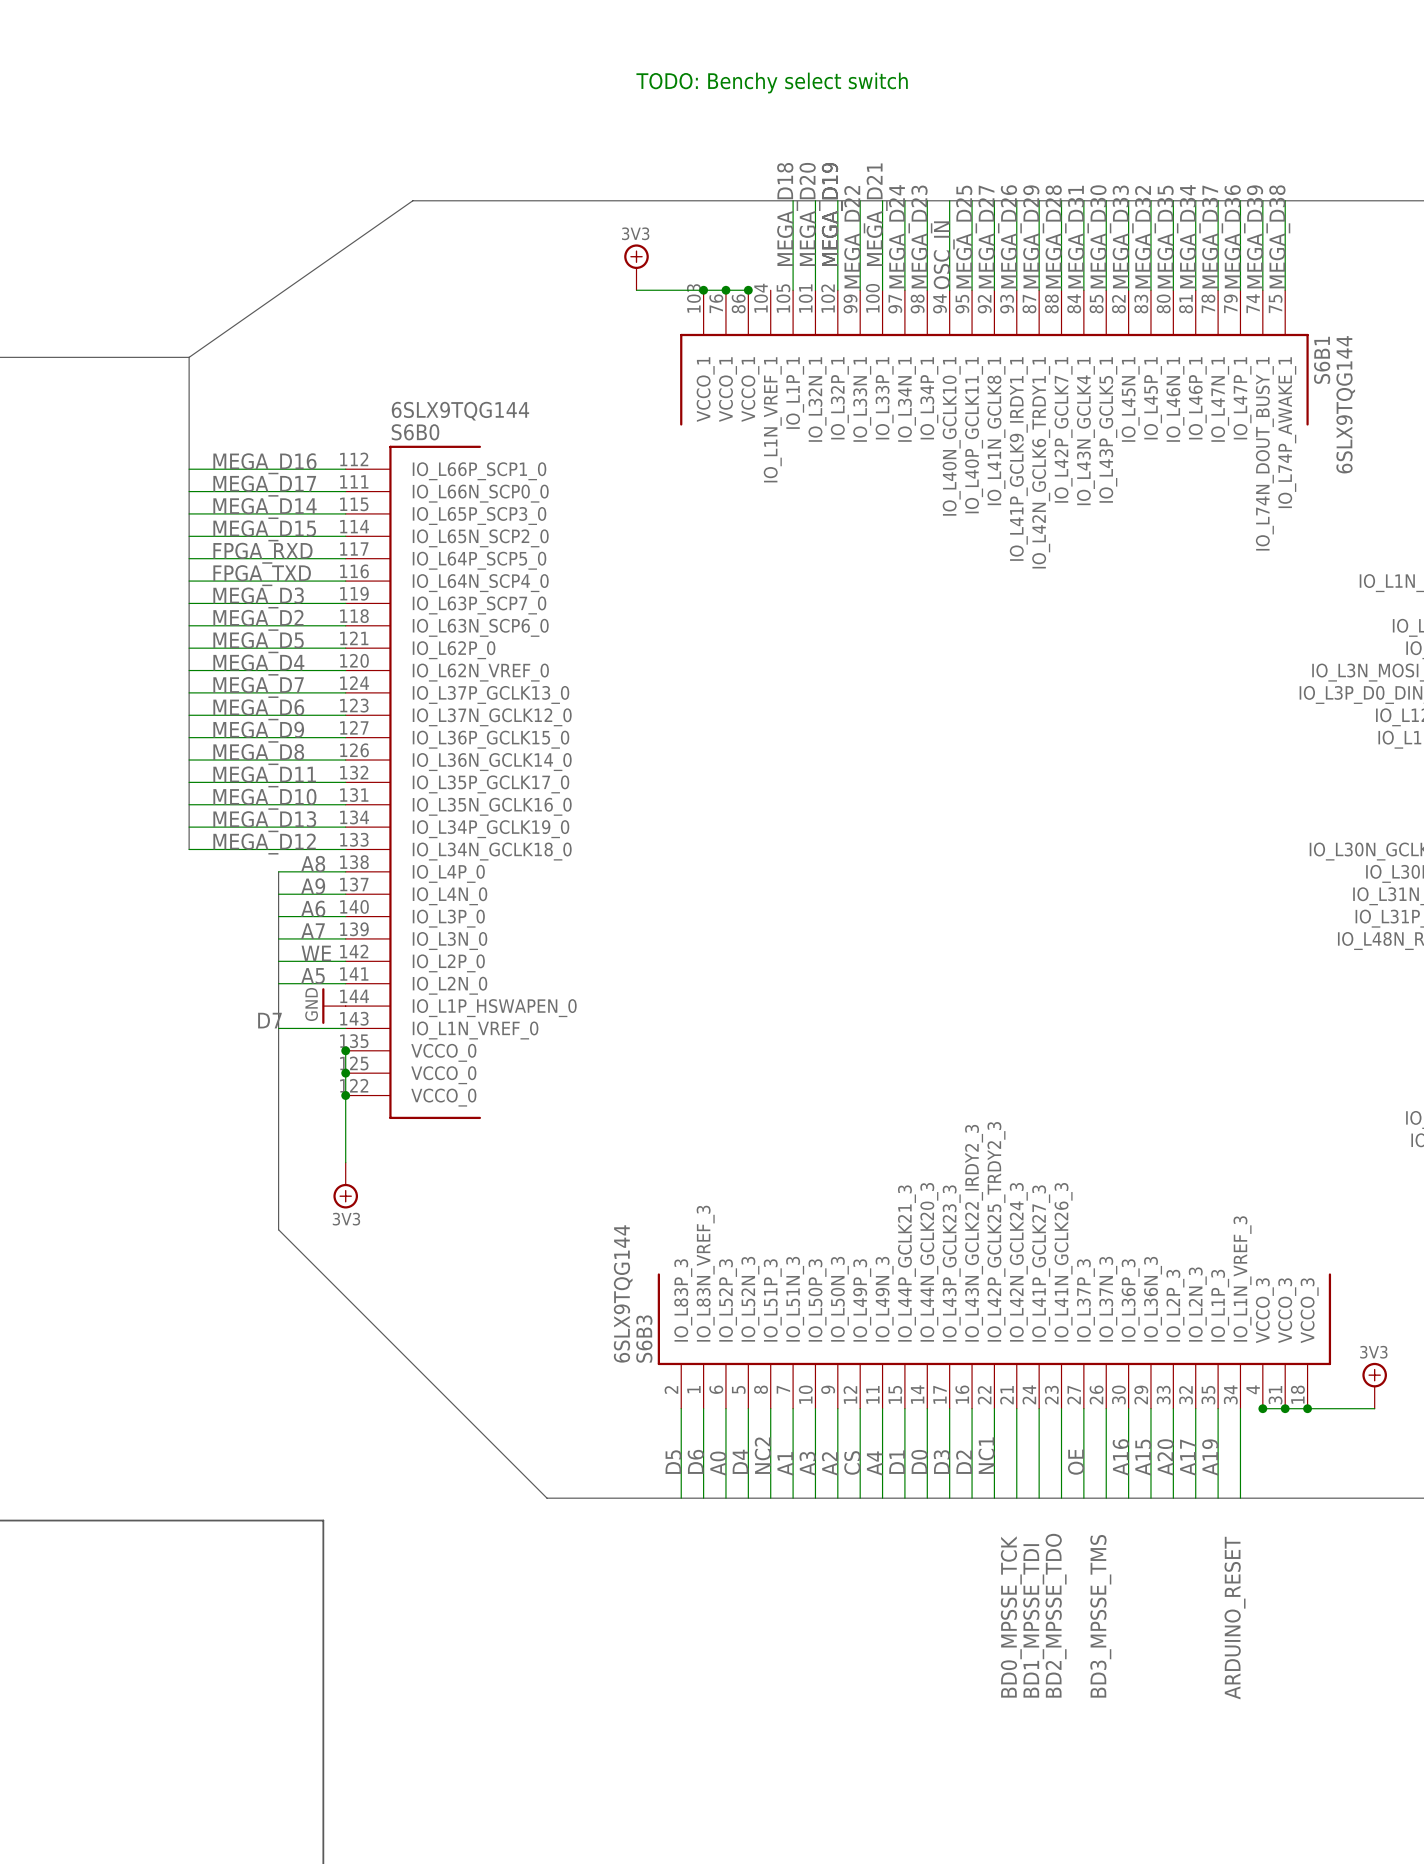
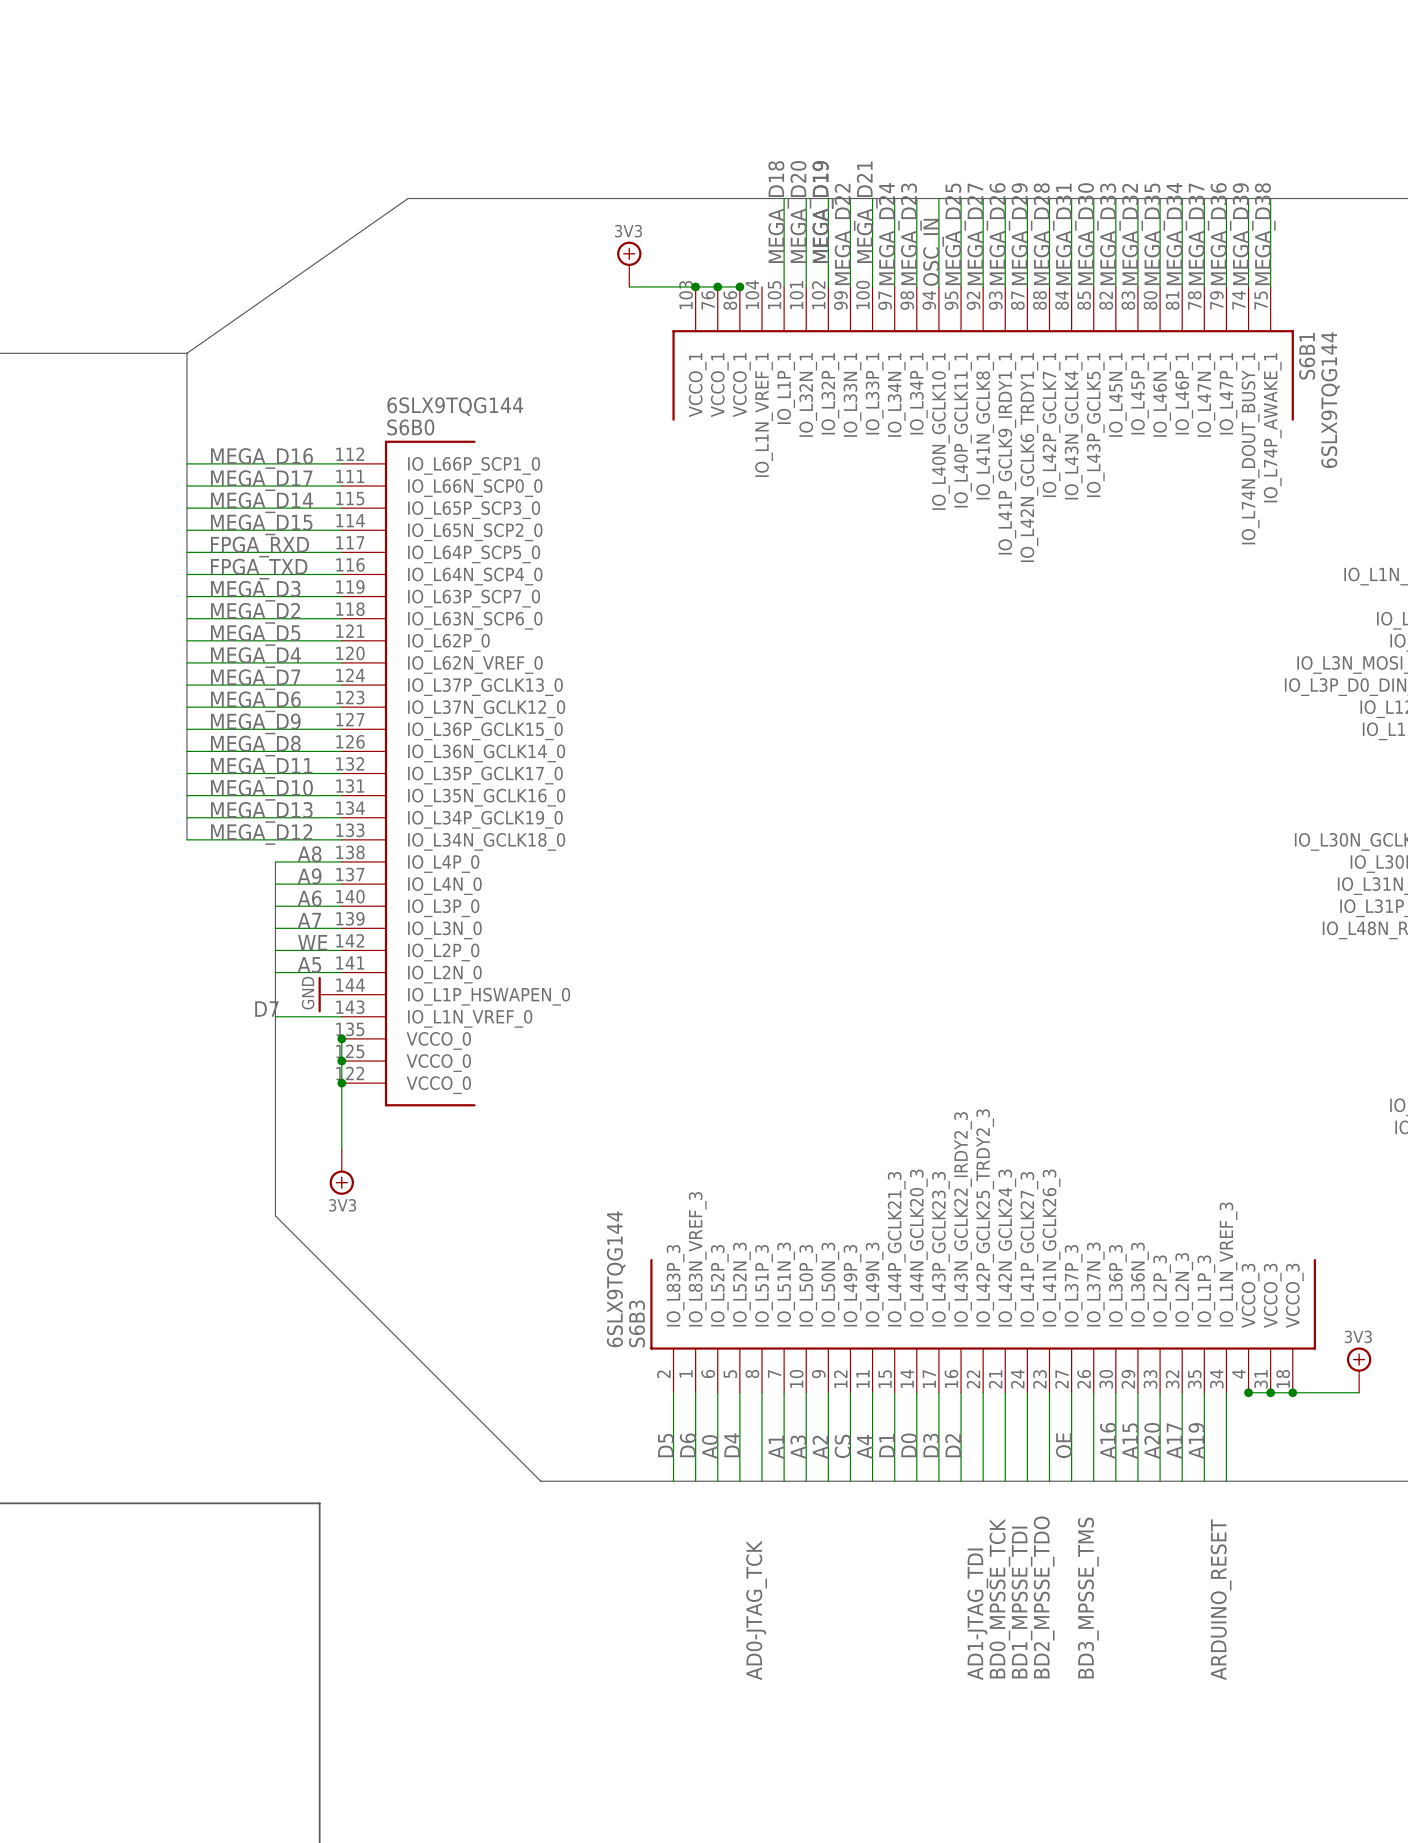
text: TODO: Benchy select switch (772, 83) -> none
label: NC2 (762, 1455) -> none
label: NC1 (986, 1455) -> none
label: none -> AD0-JTAG_TCK (756, 1610)
label: none -> AD1-JTAG_TDI (977, 1614)

